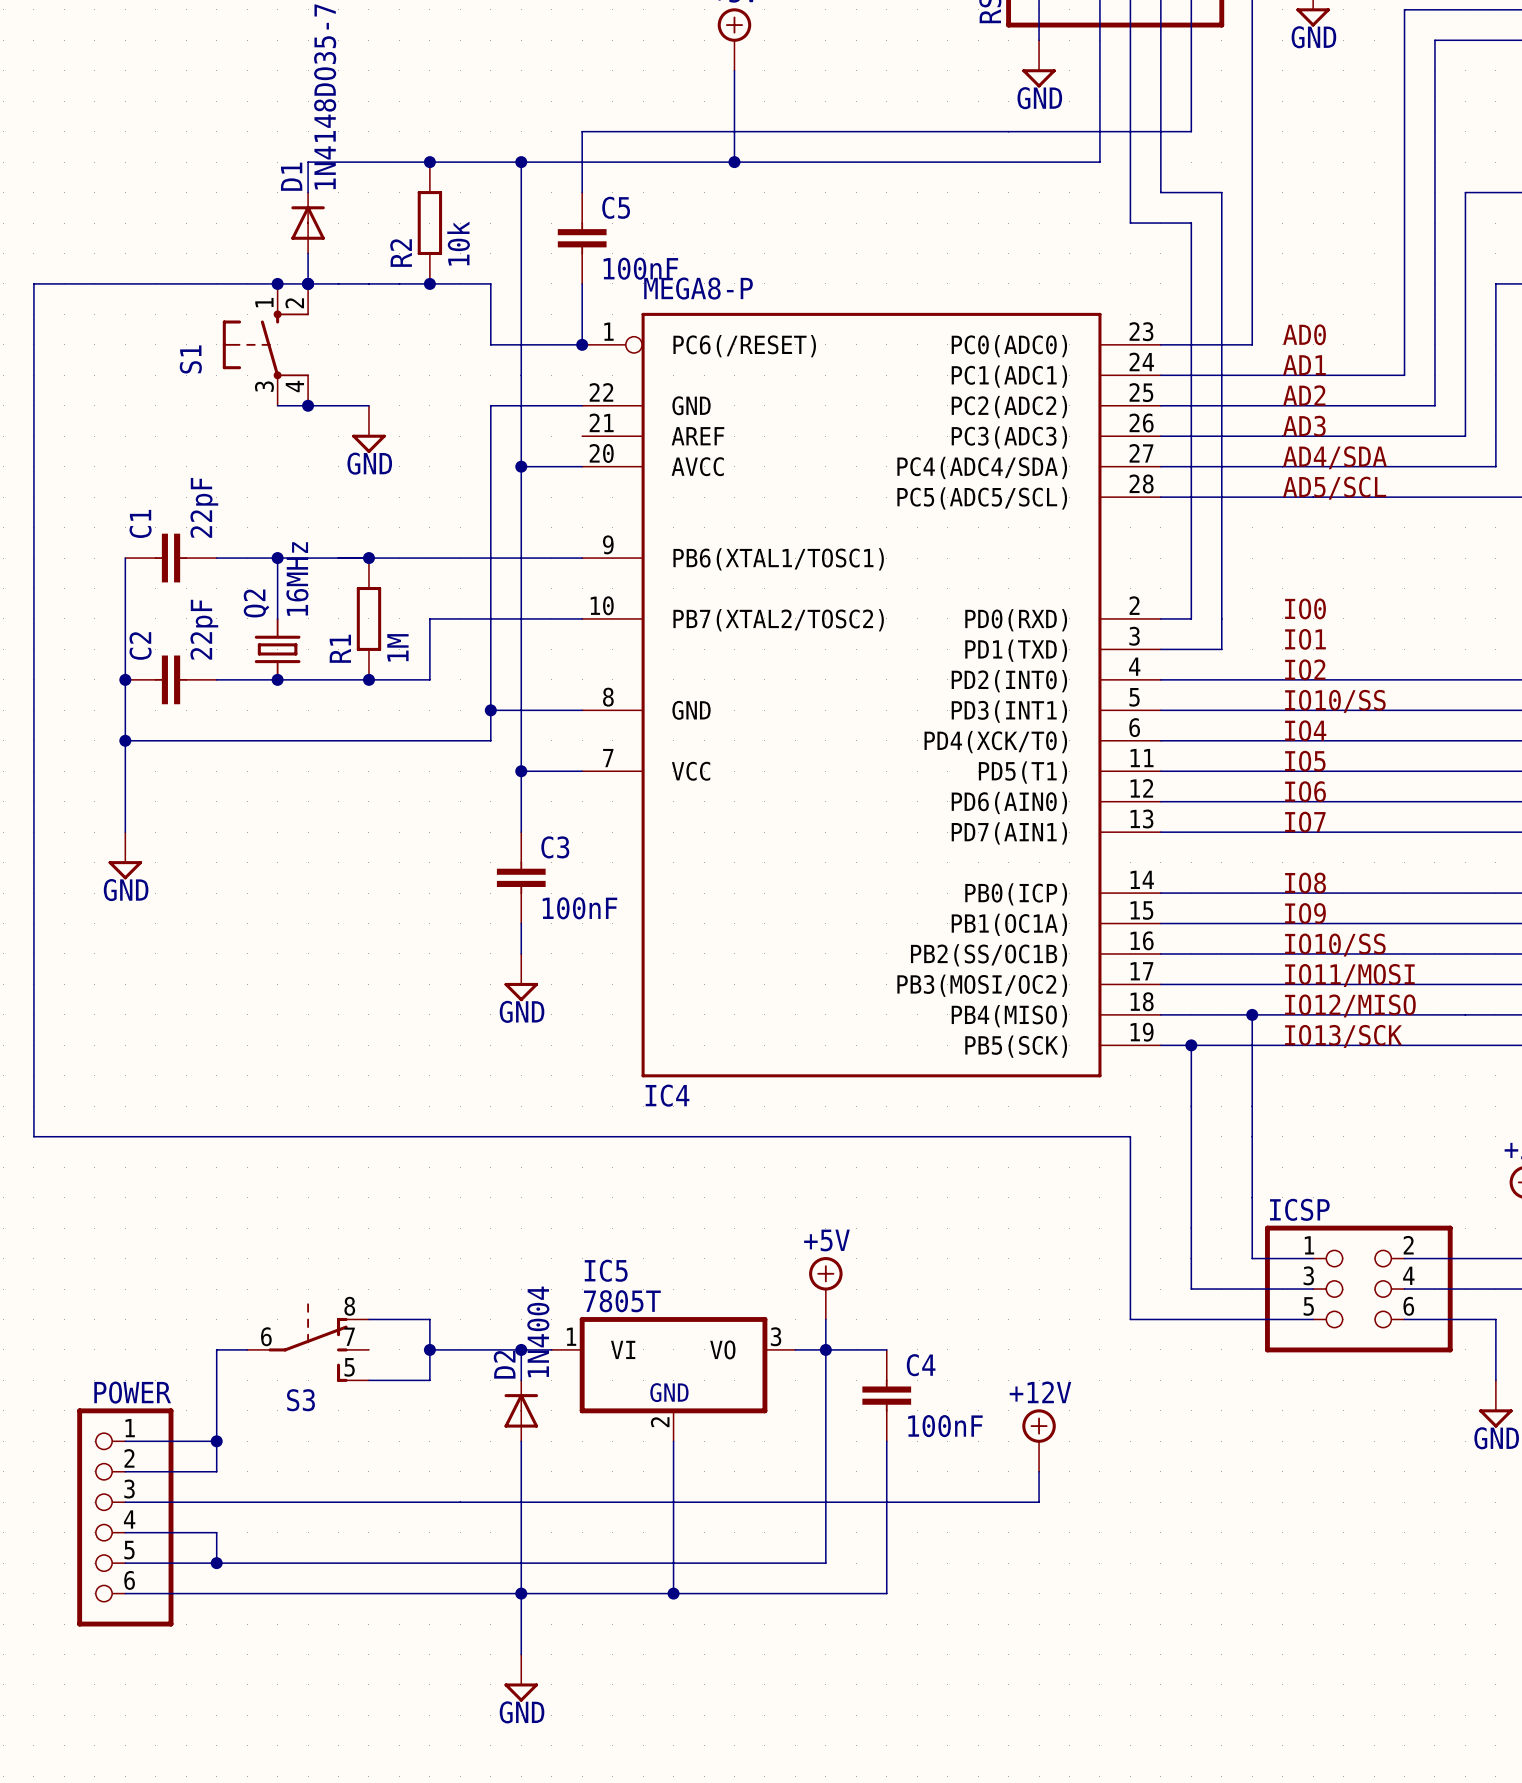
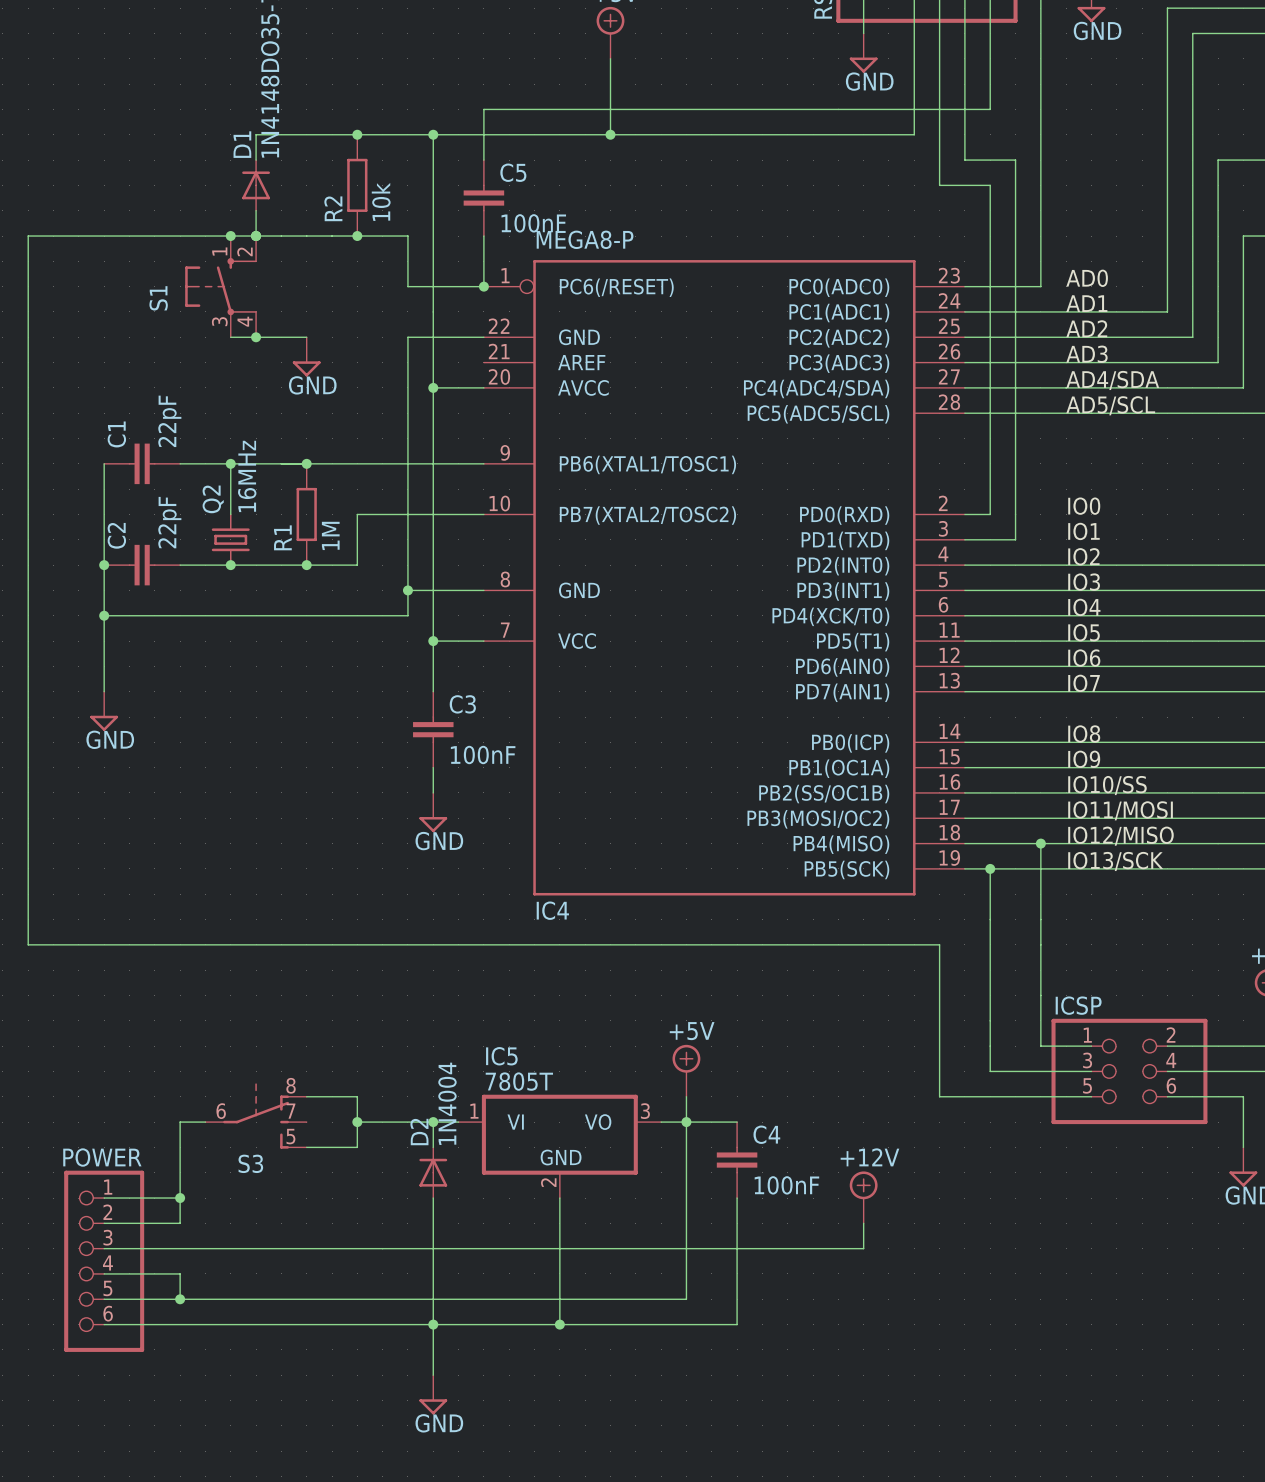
label: IO10/SS (1335, 701) -> IO3 (1084, 582)

